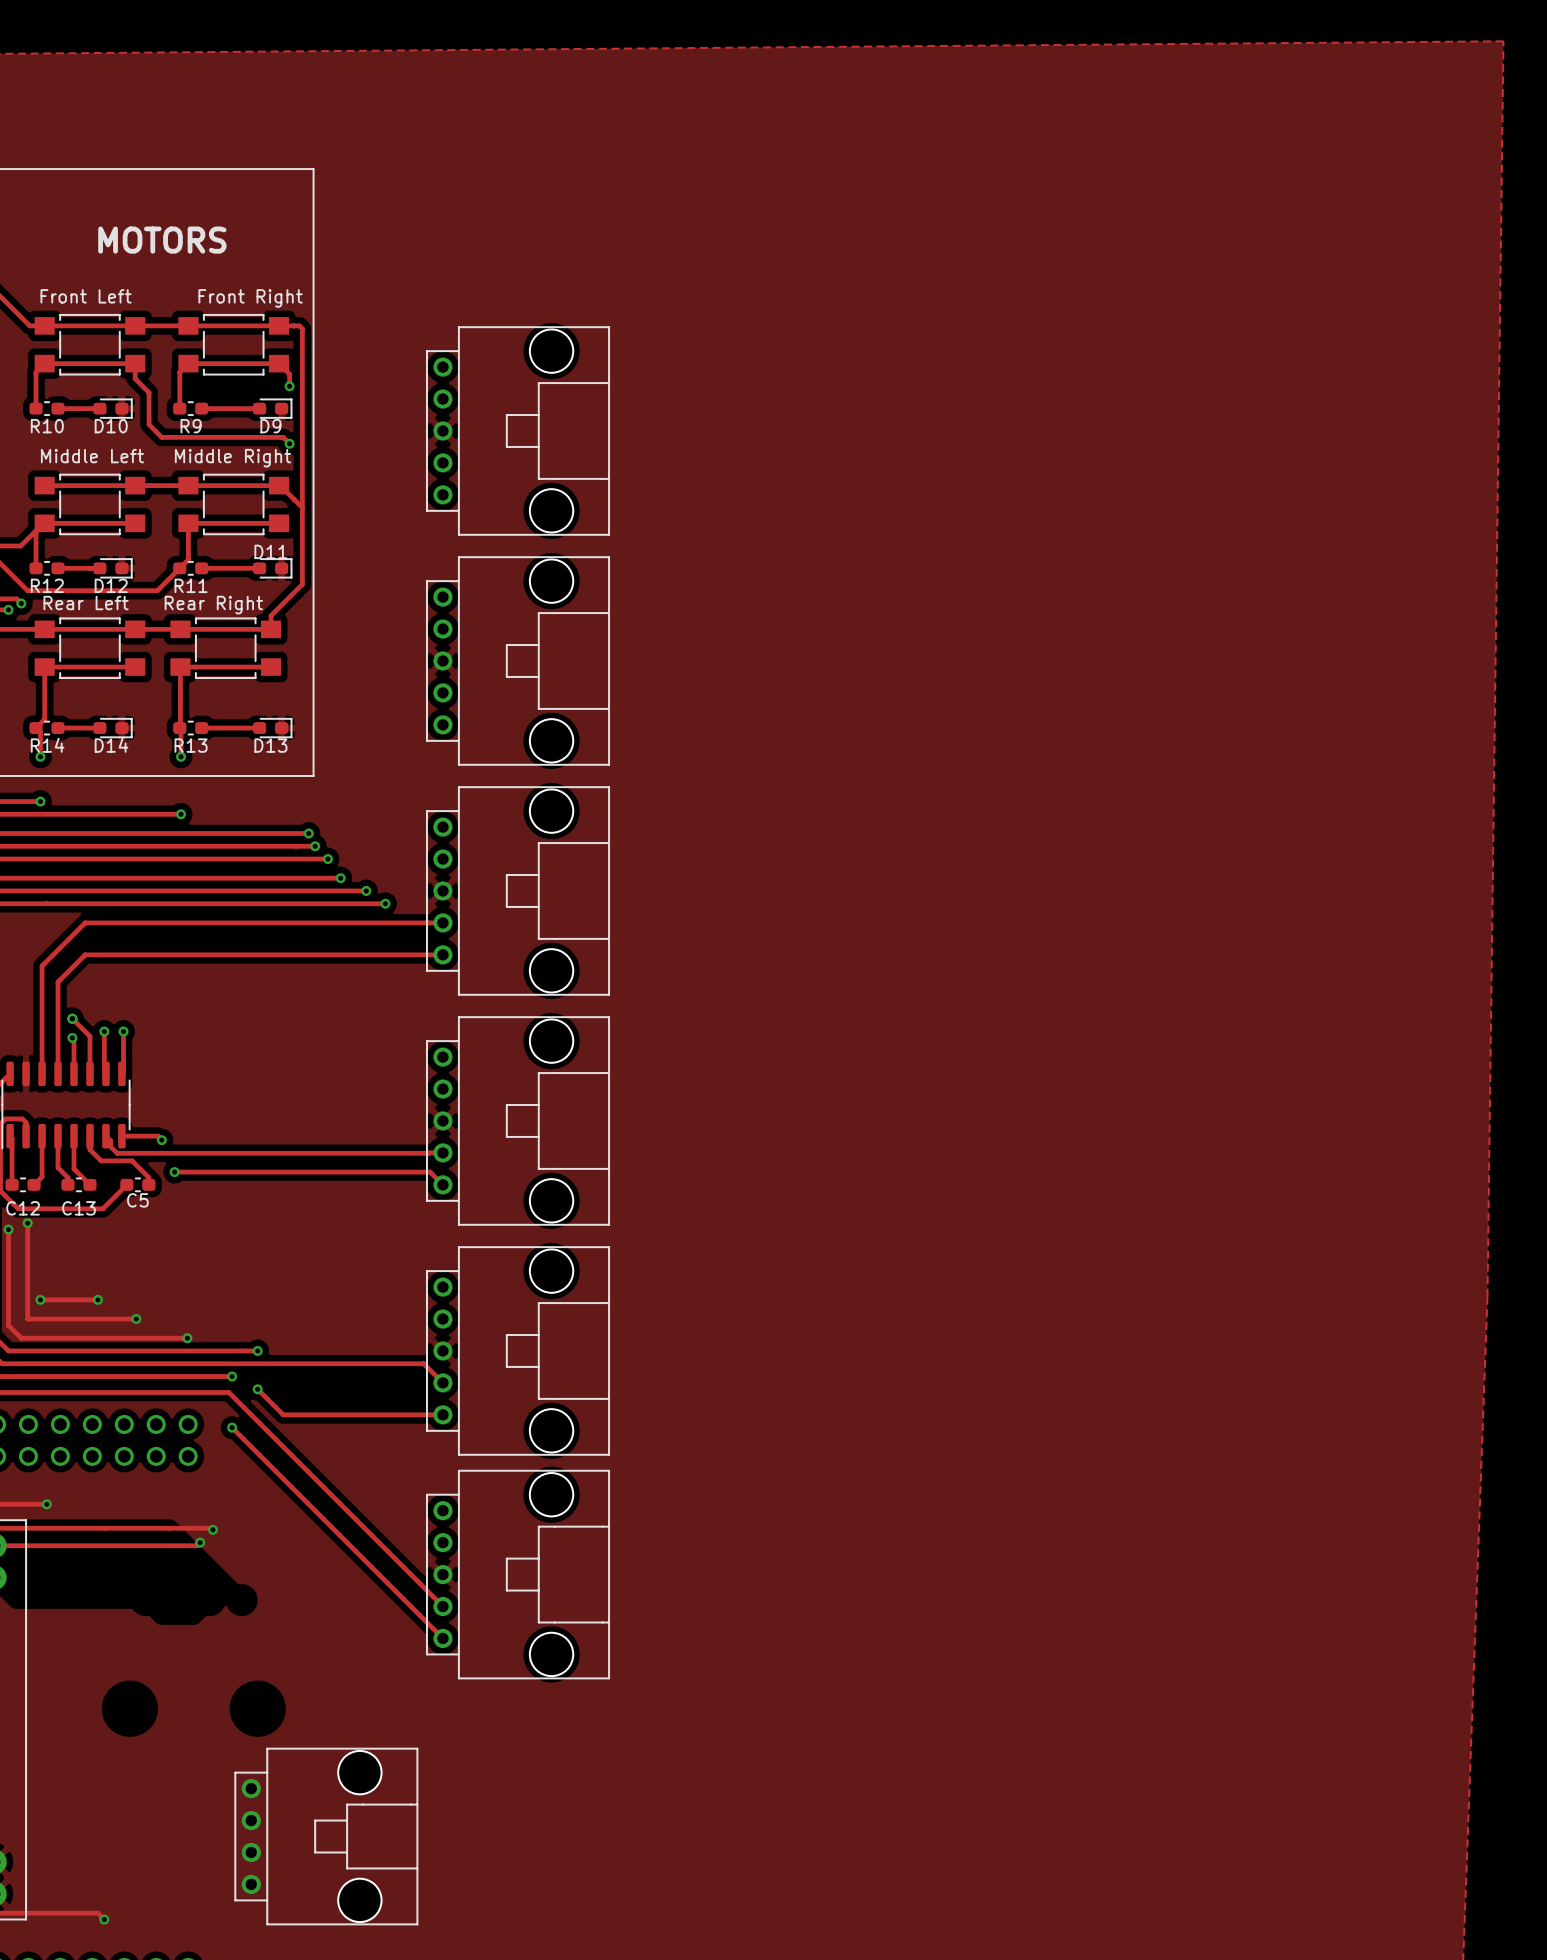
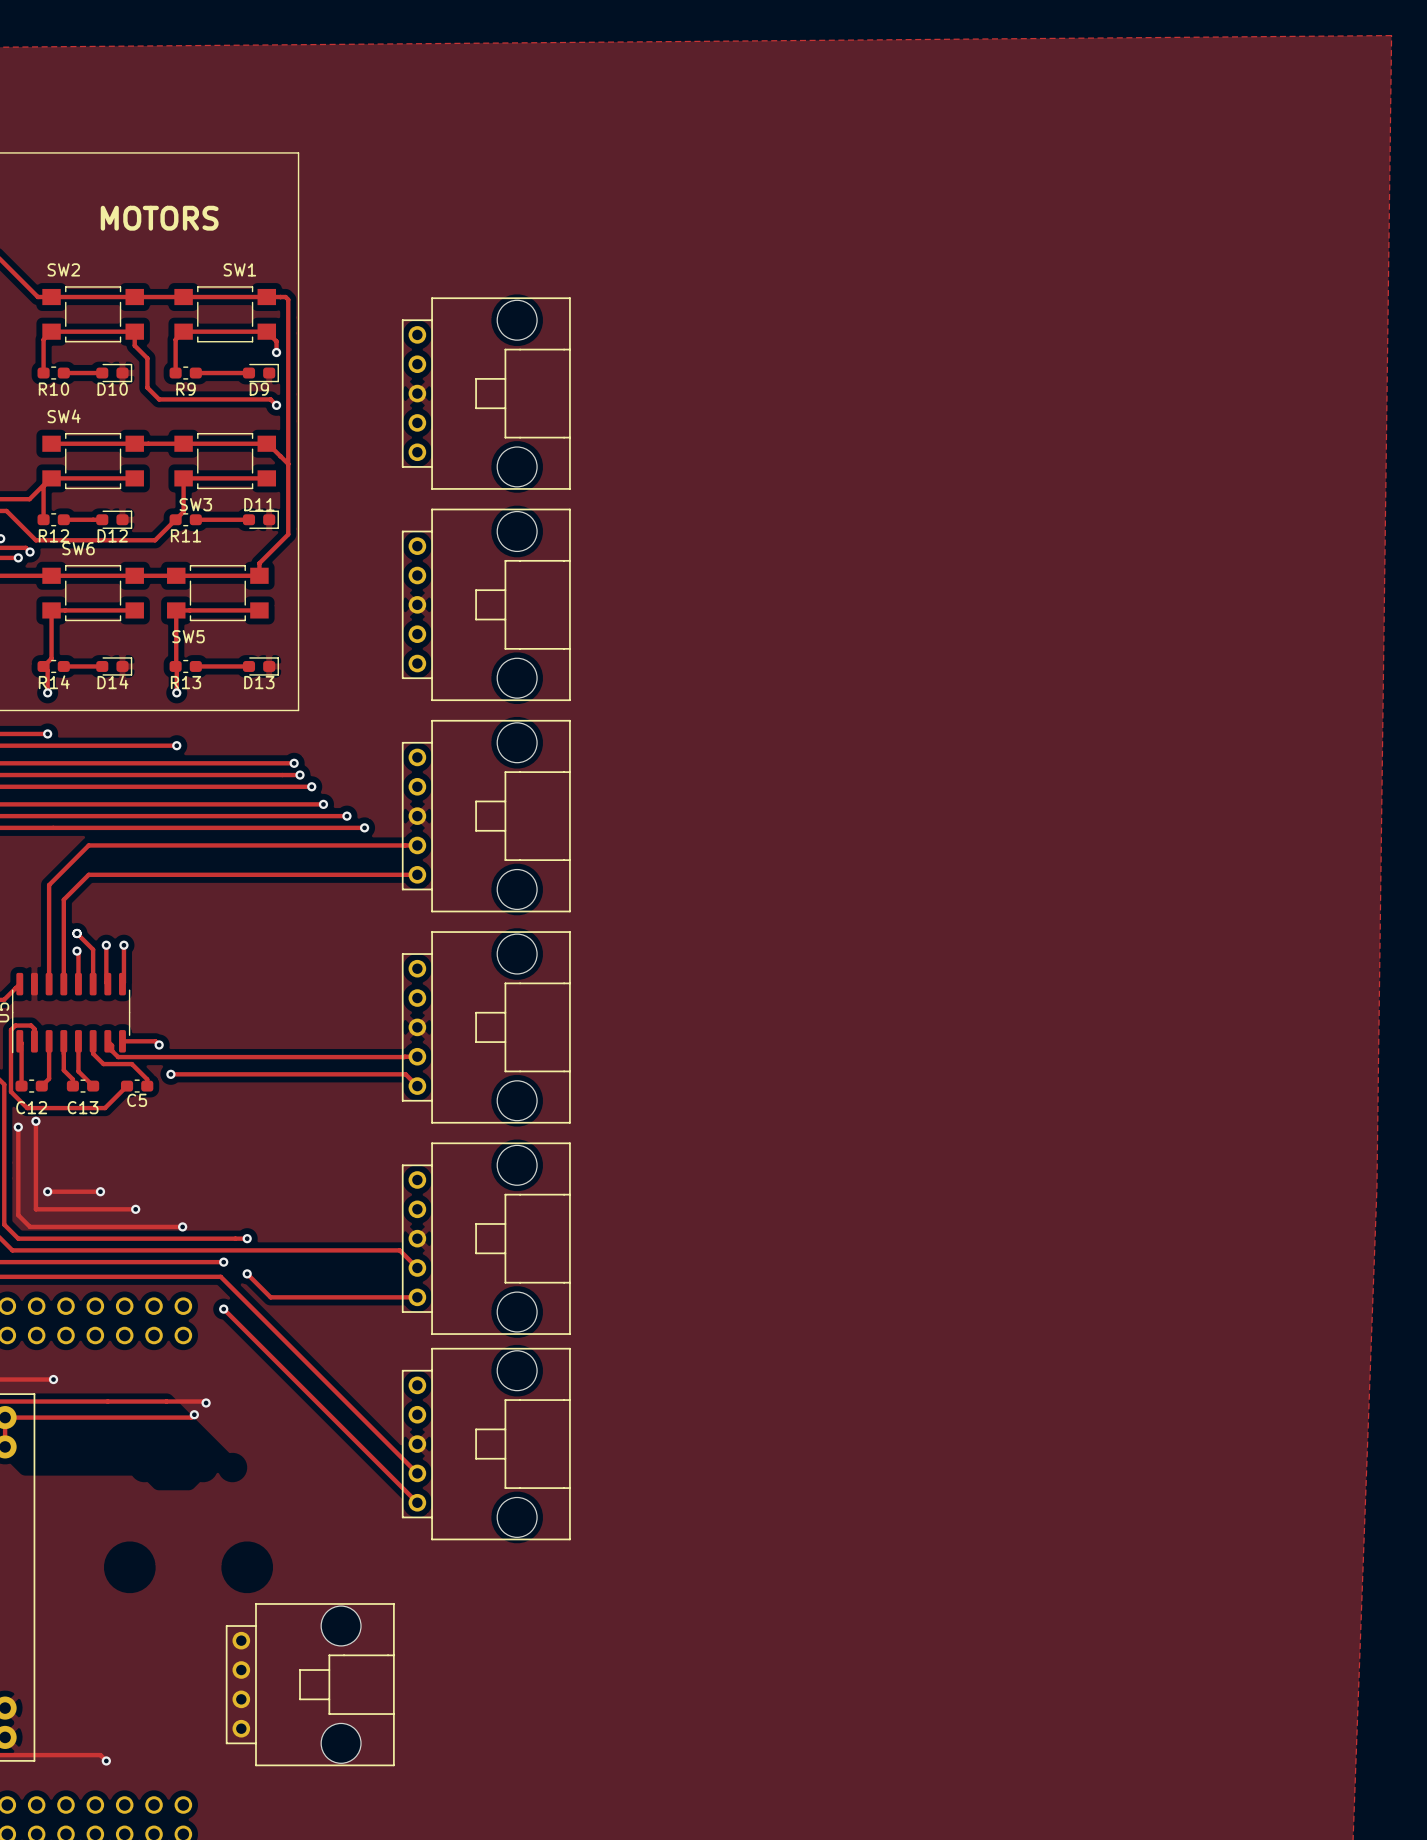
Front Left name: Front Left (86, 296) -> SW2 (63, 269)
Front Right name: Front Right (250, 298) -> SW1 (239, 269)
Middle Left name: Middle Left (92, 456) -> SW4 (64, 416)
Middle Right name: Middle Right (233, 458) -> SW3 (195, 504)
Rear Left name: Rear Left (86, 603) -> SW6 (78, 548)
Rear Right name: Rear Right (213, 605) -> SW5 (188, 636)

